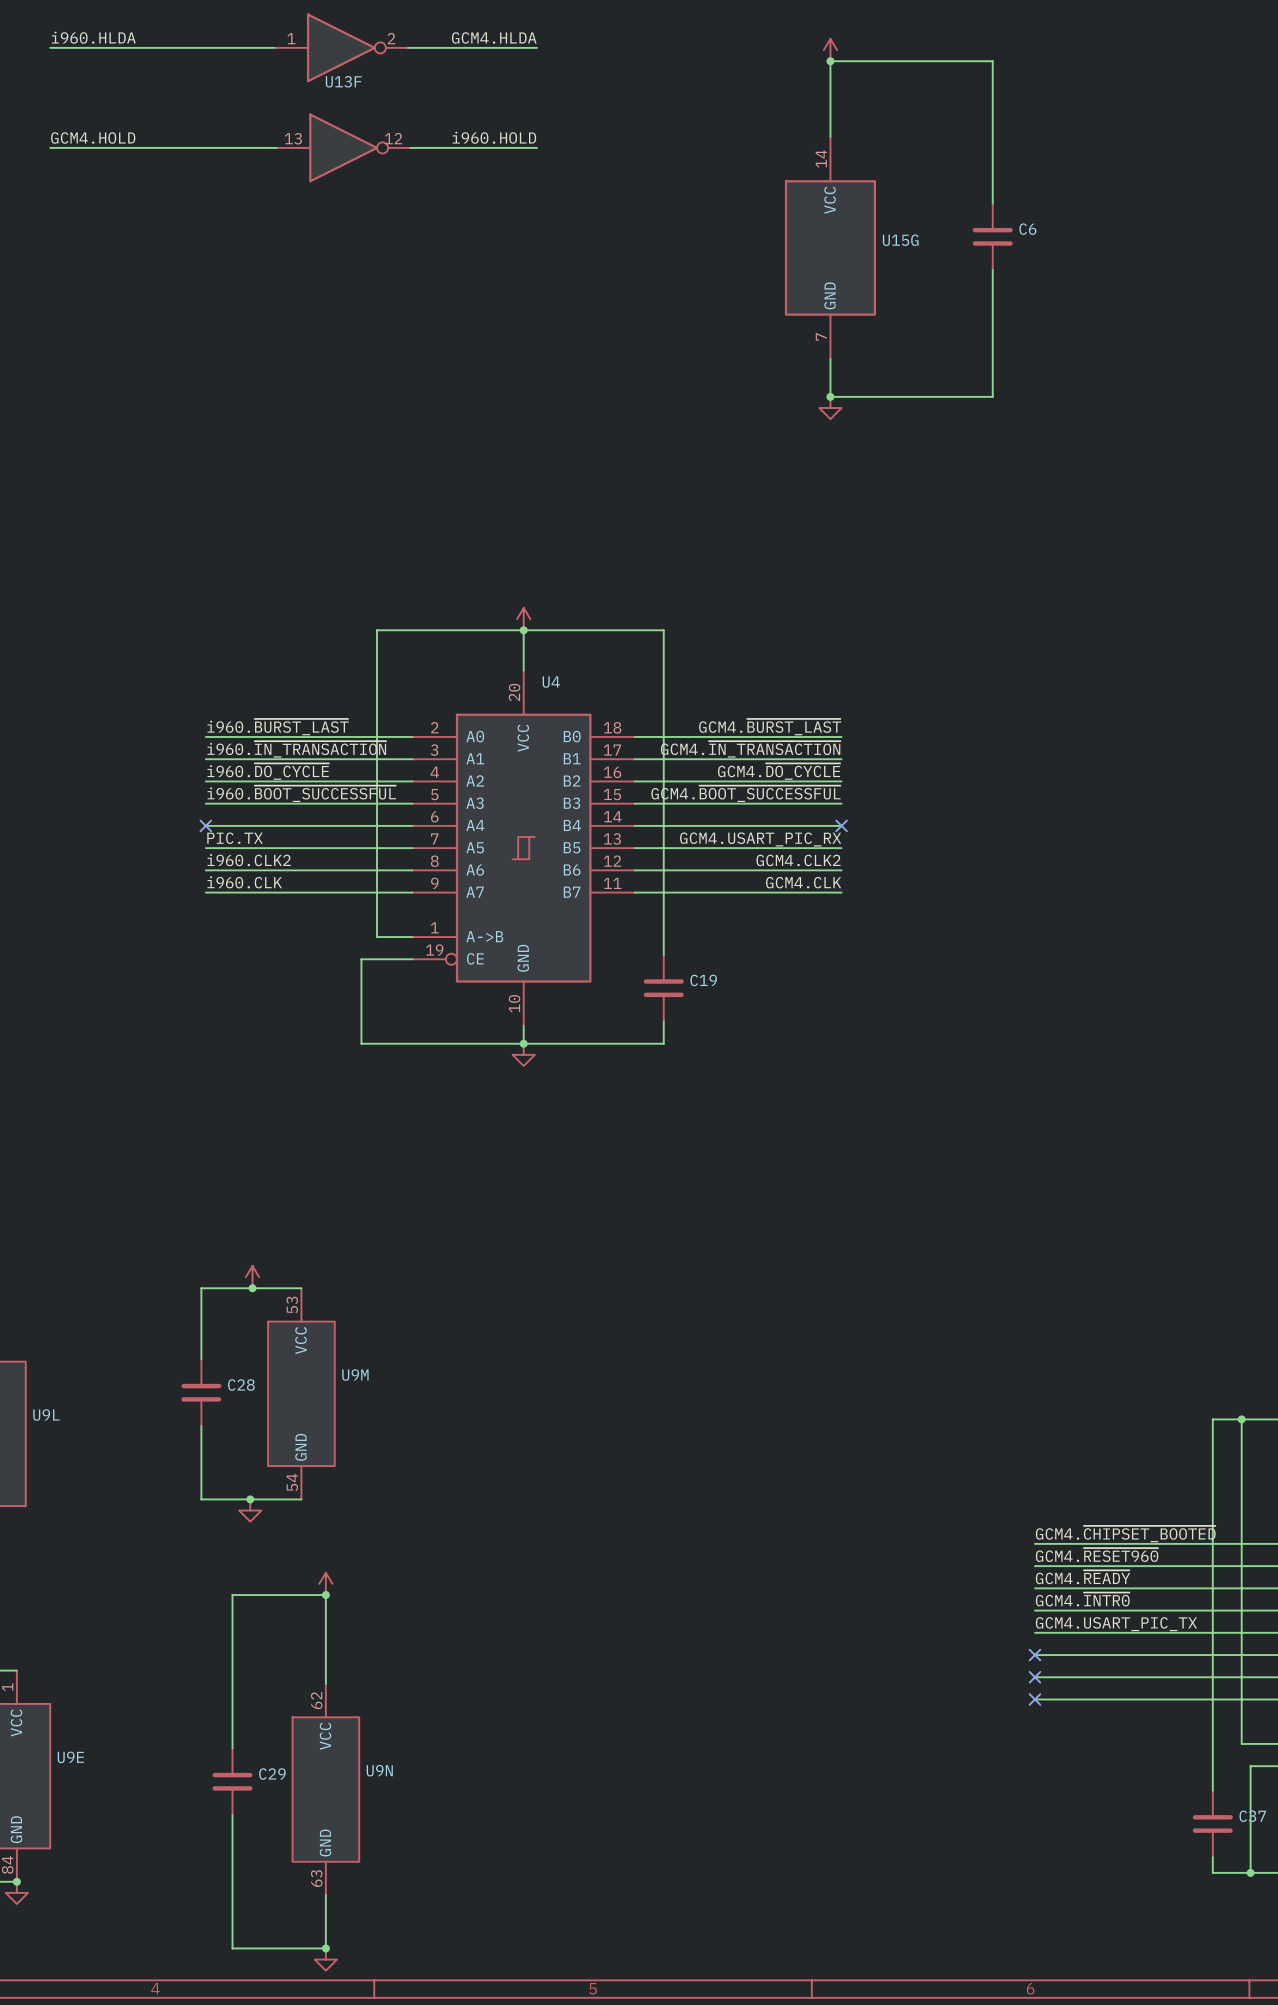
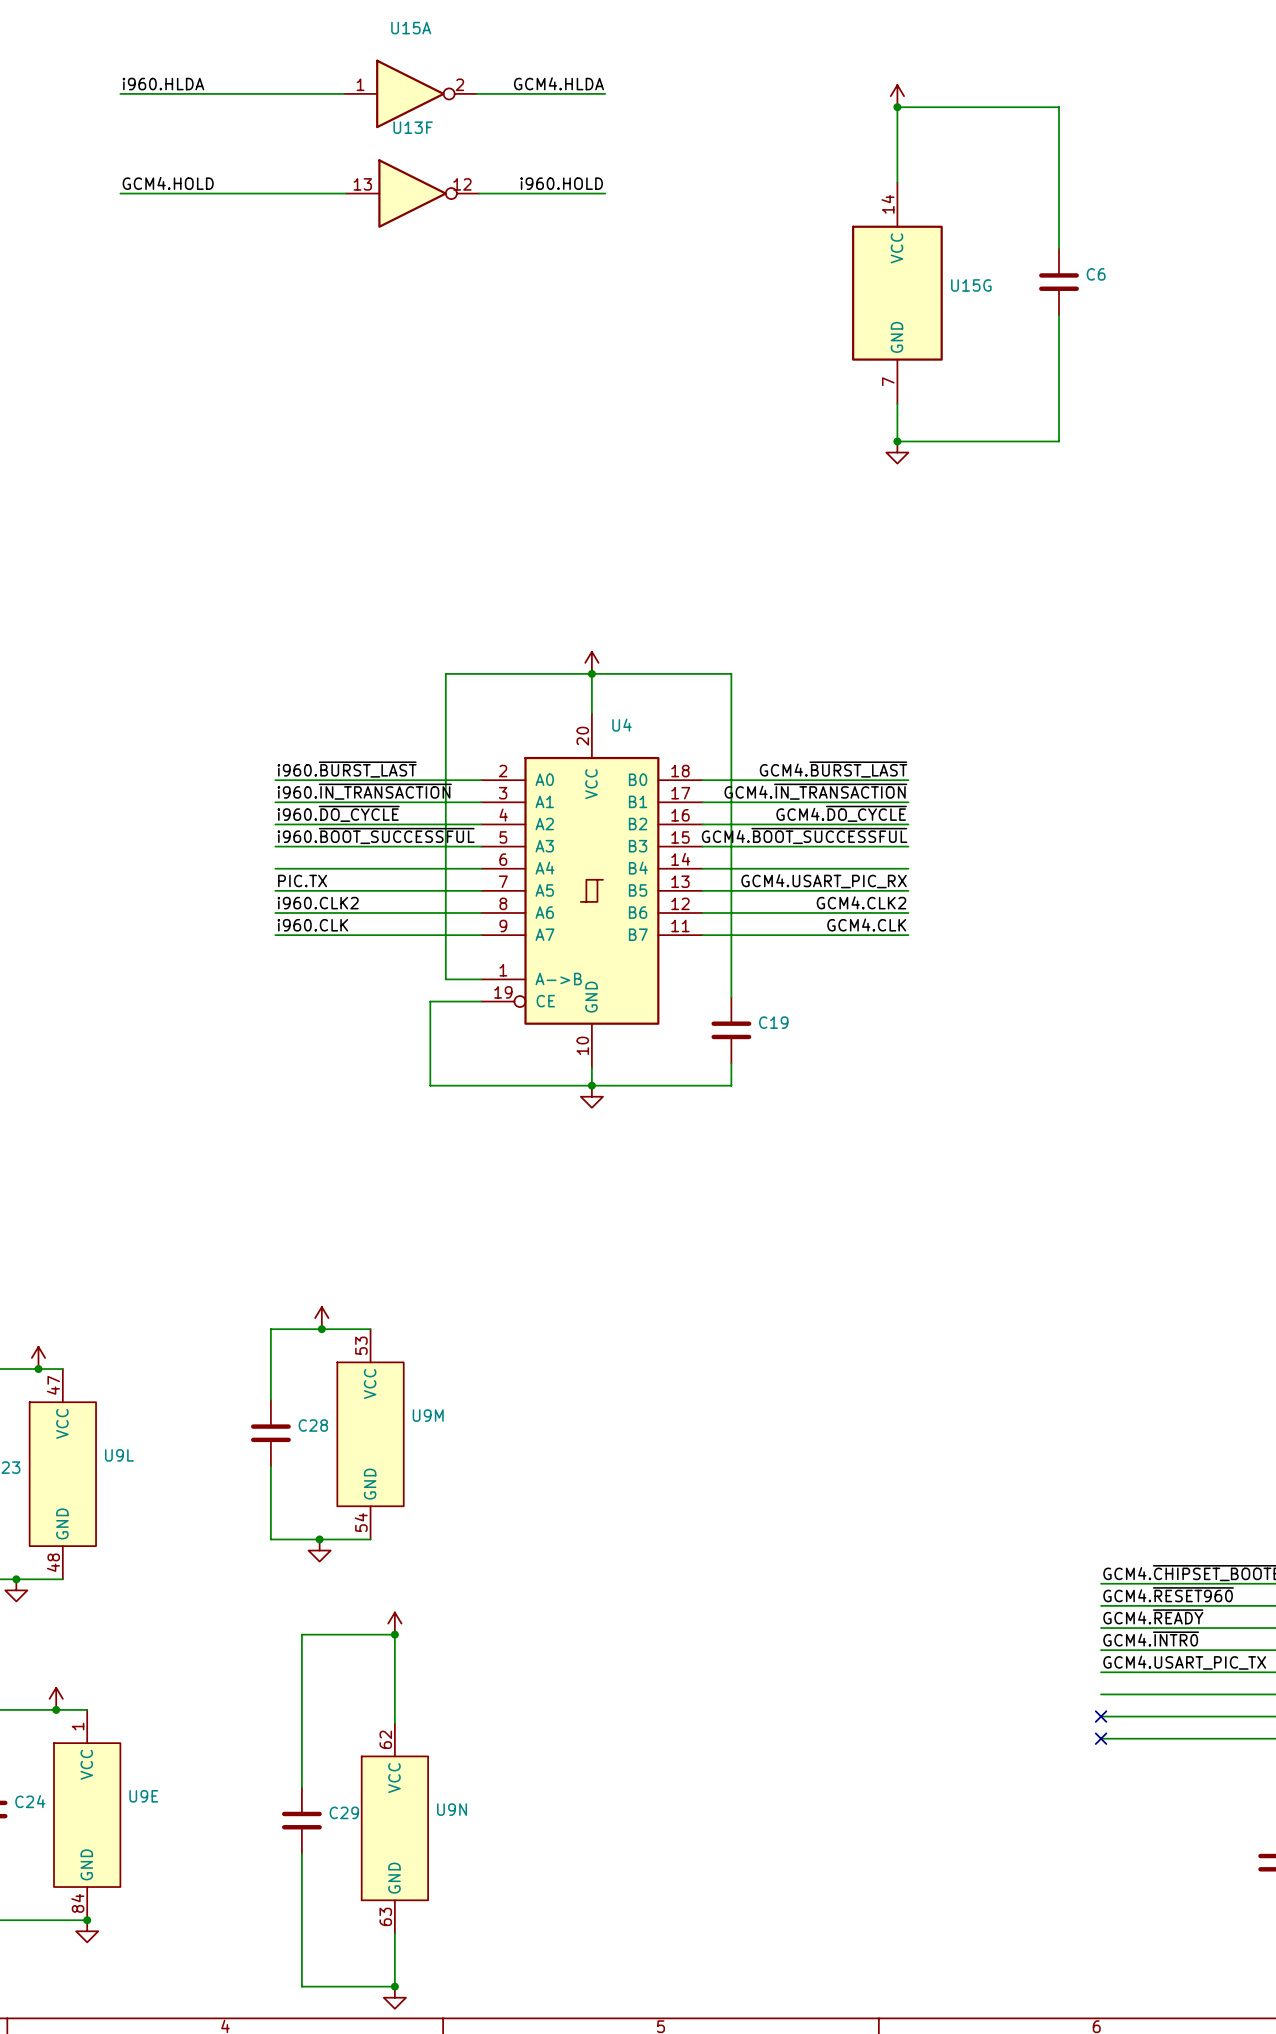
no-connect mark: (205, 825) -> none
no-connect mark: (841, 825) -> none
no-connect mark: (1034, 1655) -> none

